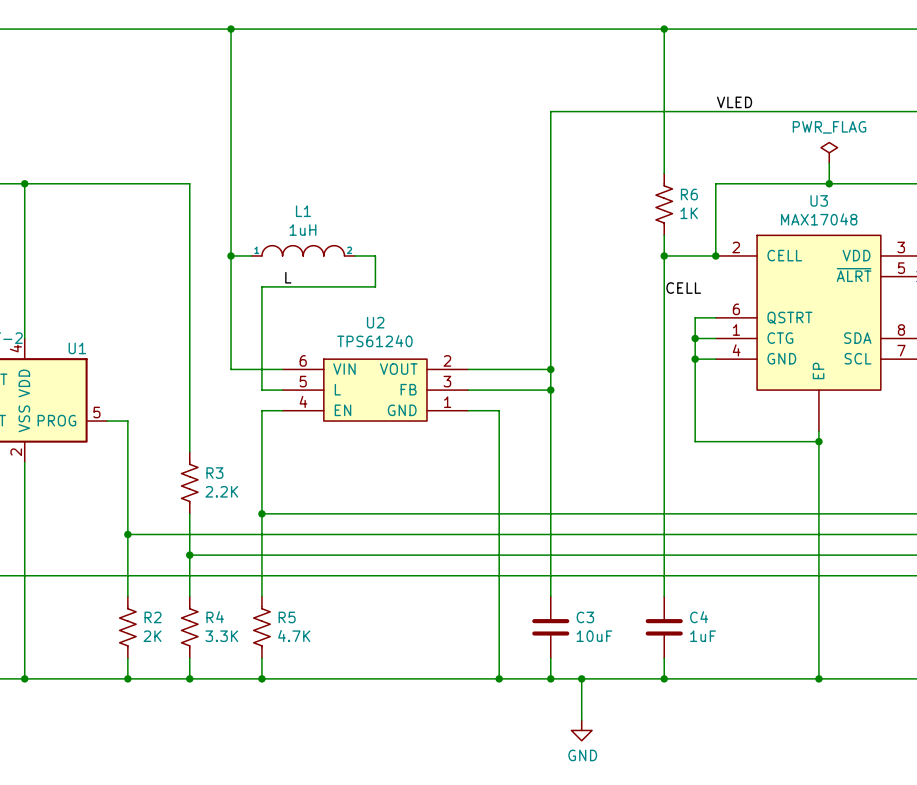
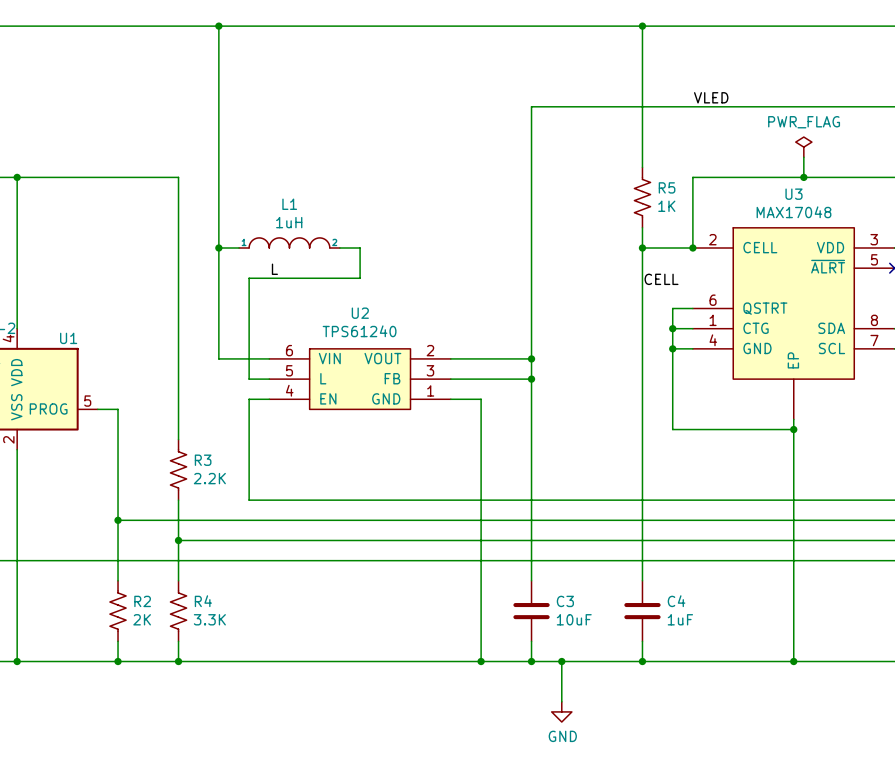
R6 name: R6 (689, 194) -> R5 (667, 187)
wire: (261, 513) (261, 596) -> none
junction: (261, 513) -> none
R5: 4.7K (261, 627) -> none
wire: (261, 658) (261, 678) -> none
junction: (261, 678) -> none

